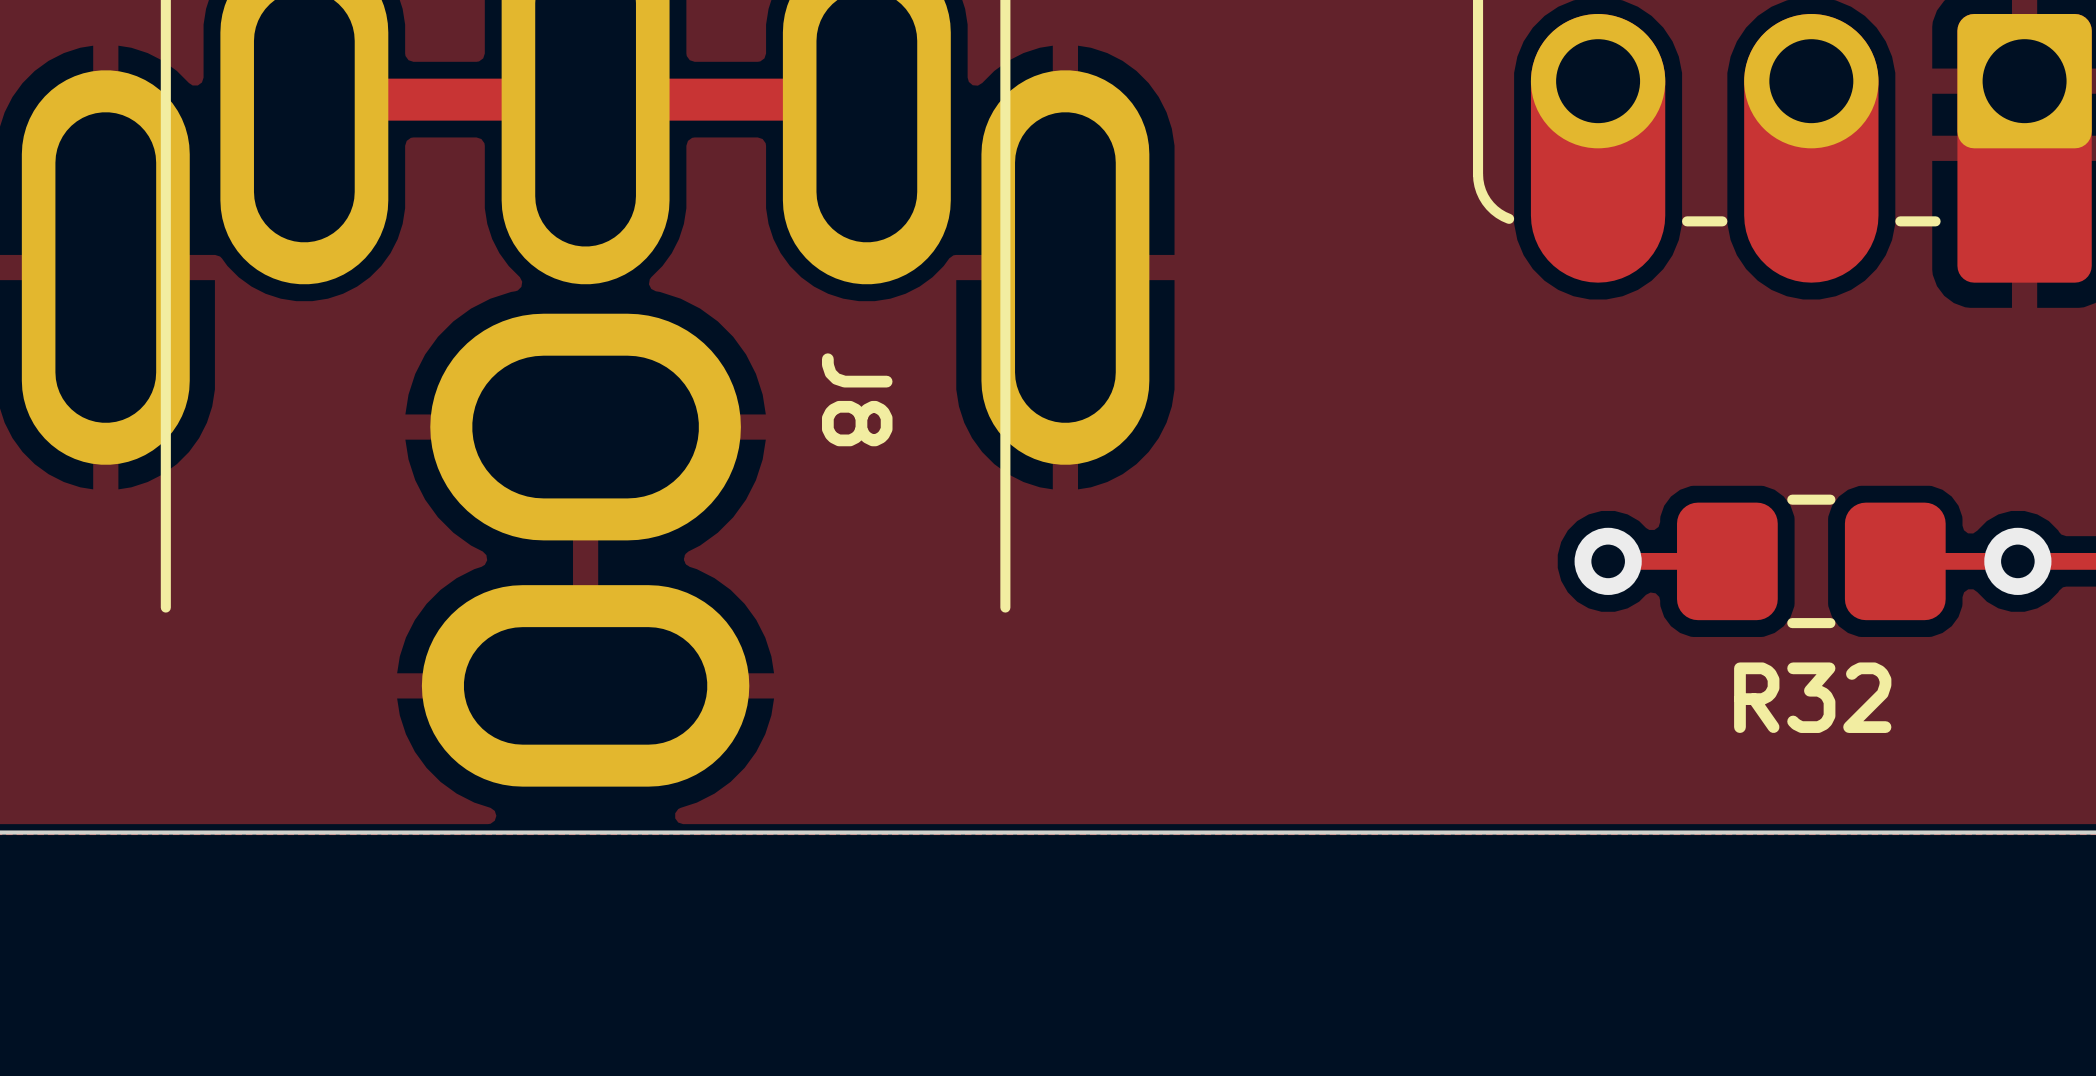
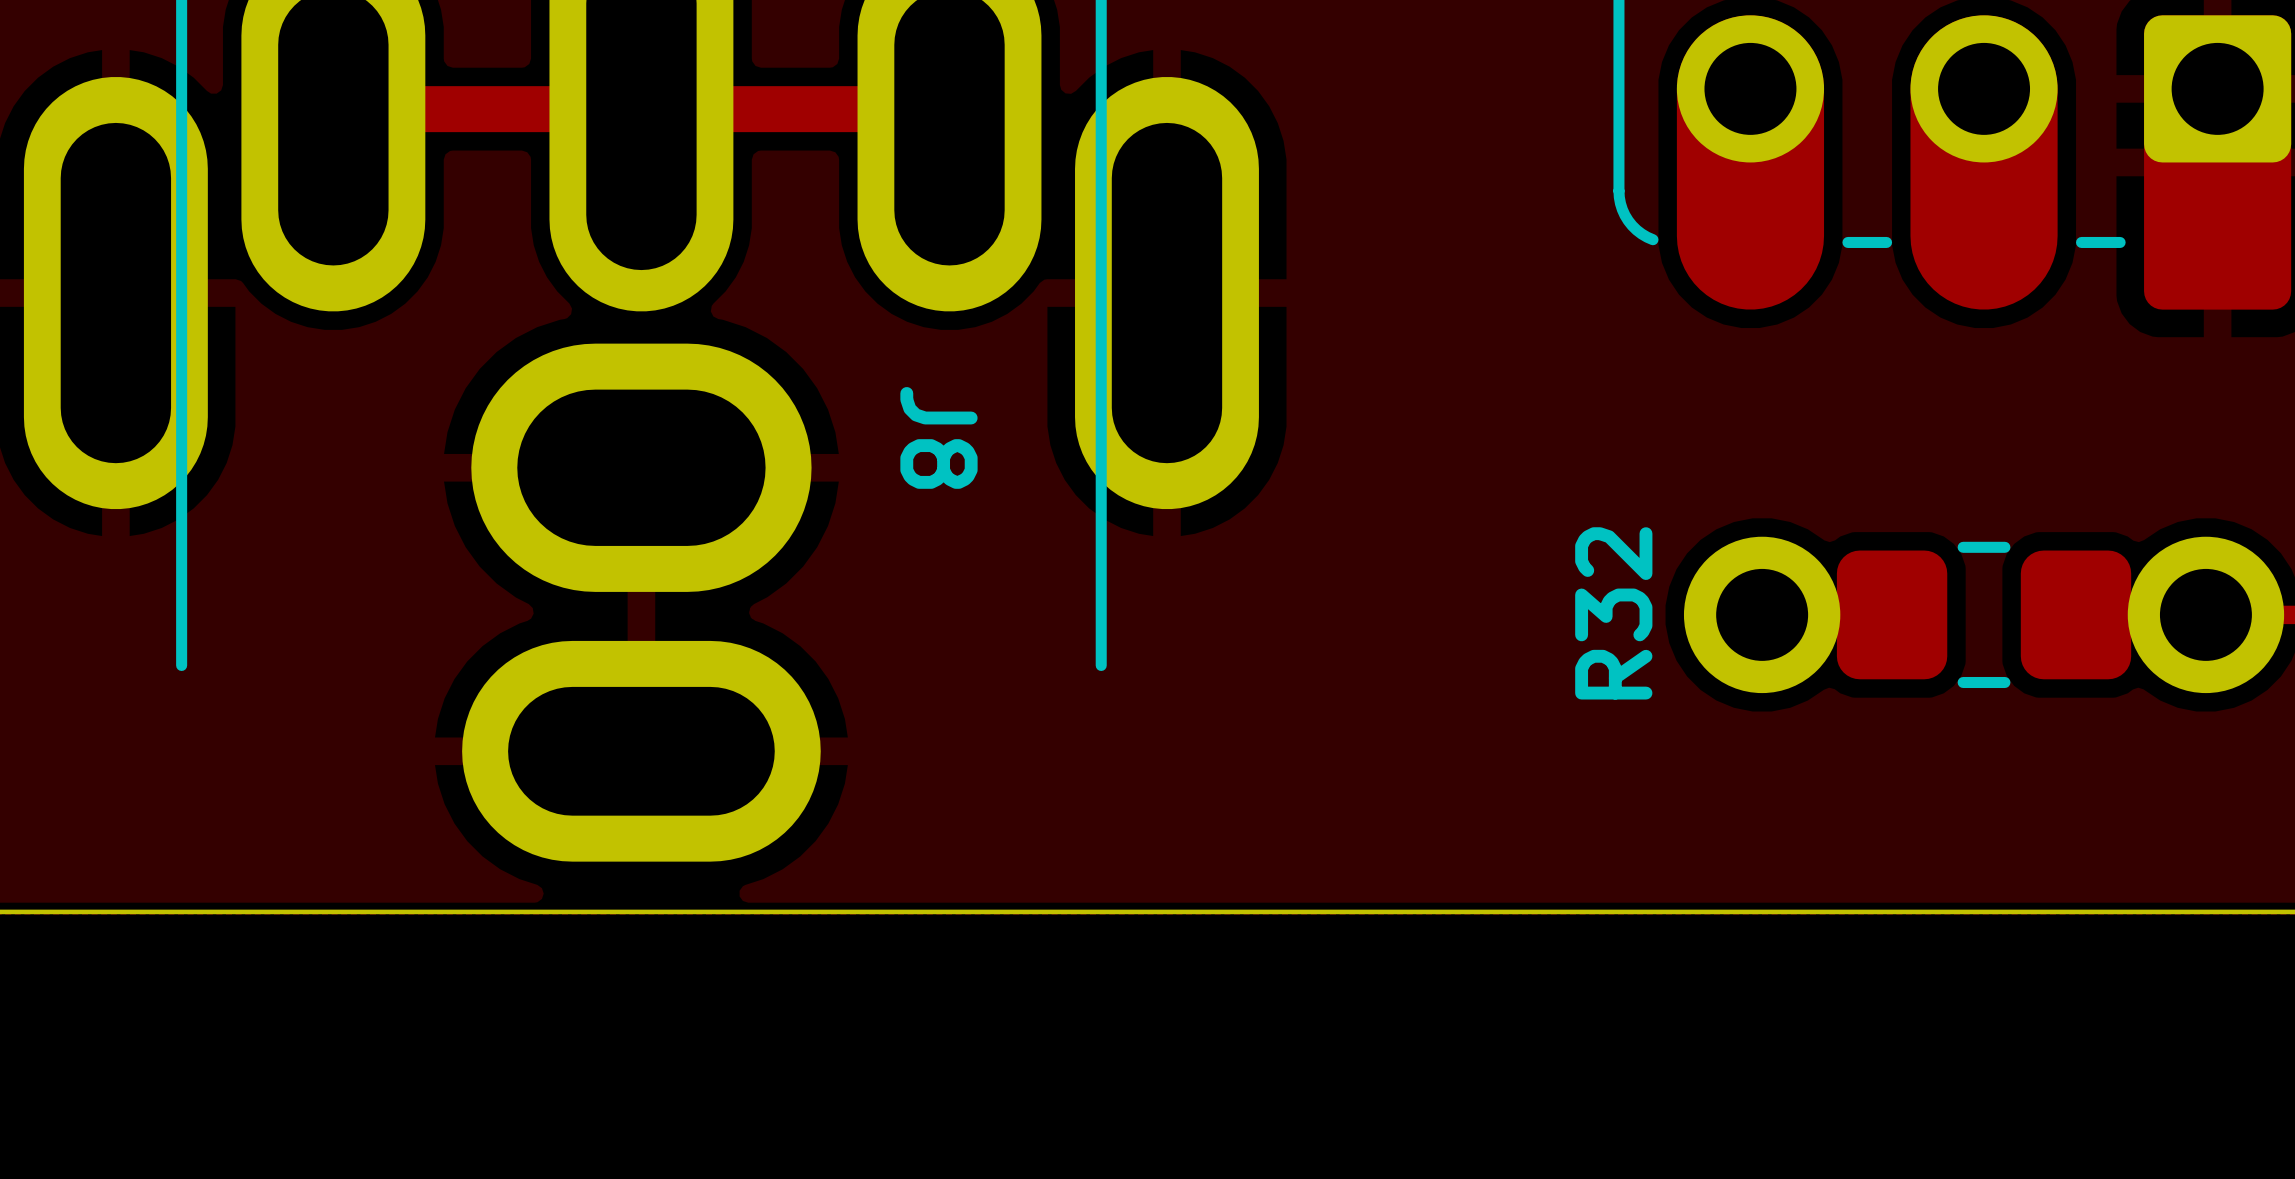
R32 footprint: [1677, 494, 1946, 629] -> [1683, 536, 2285, 694]
via: (1608, 561) -> none
via: (2017, 561) -> none
R32 name position: R32 (1812, 697) -> R32 (1613, 613)

